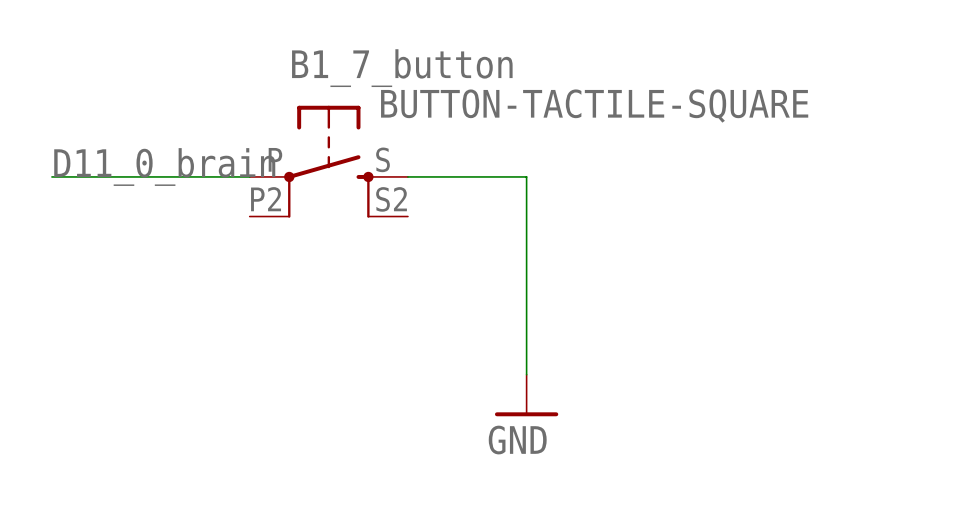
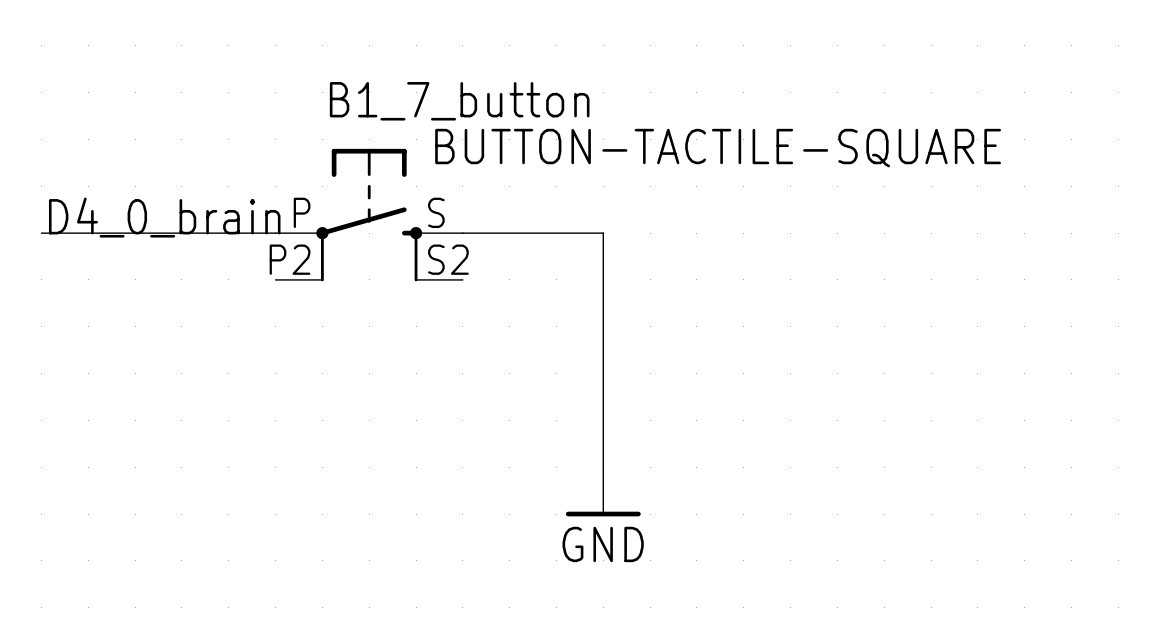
label: D11_0_brain (164, 167) -> D4_0_brain (164, 217)

